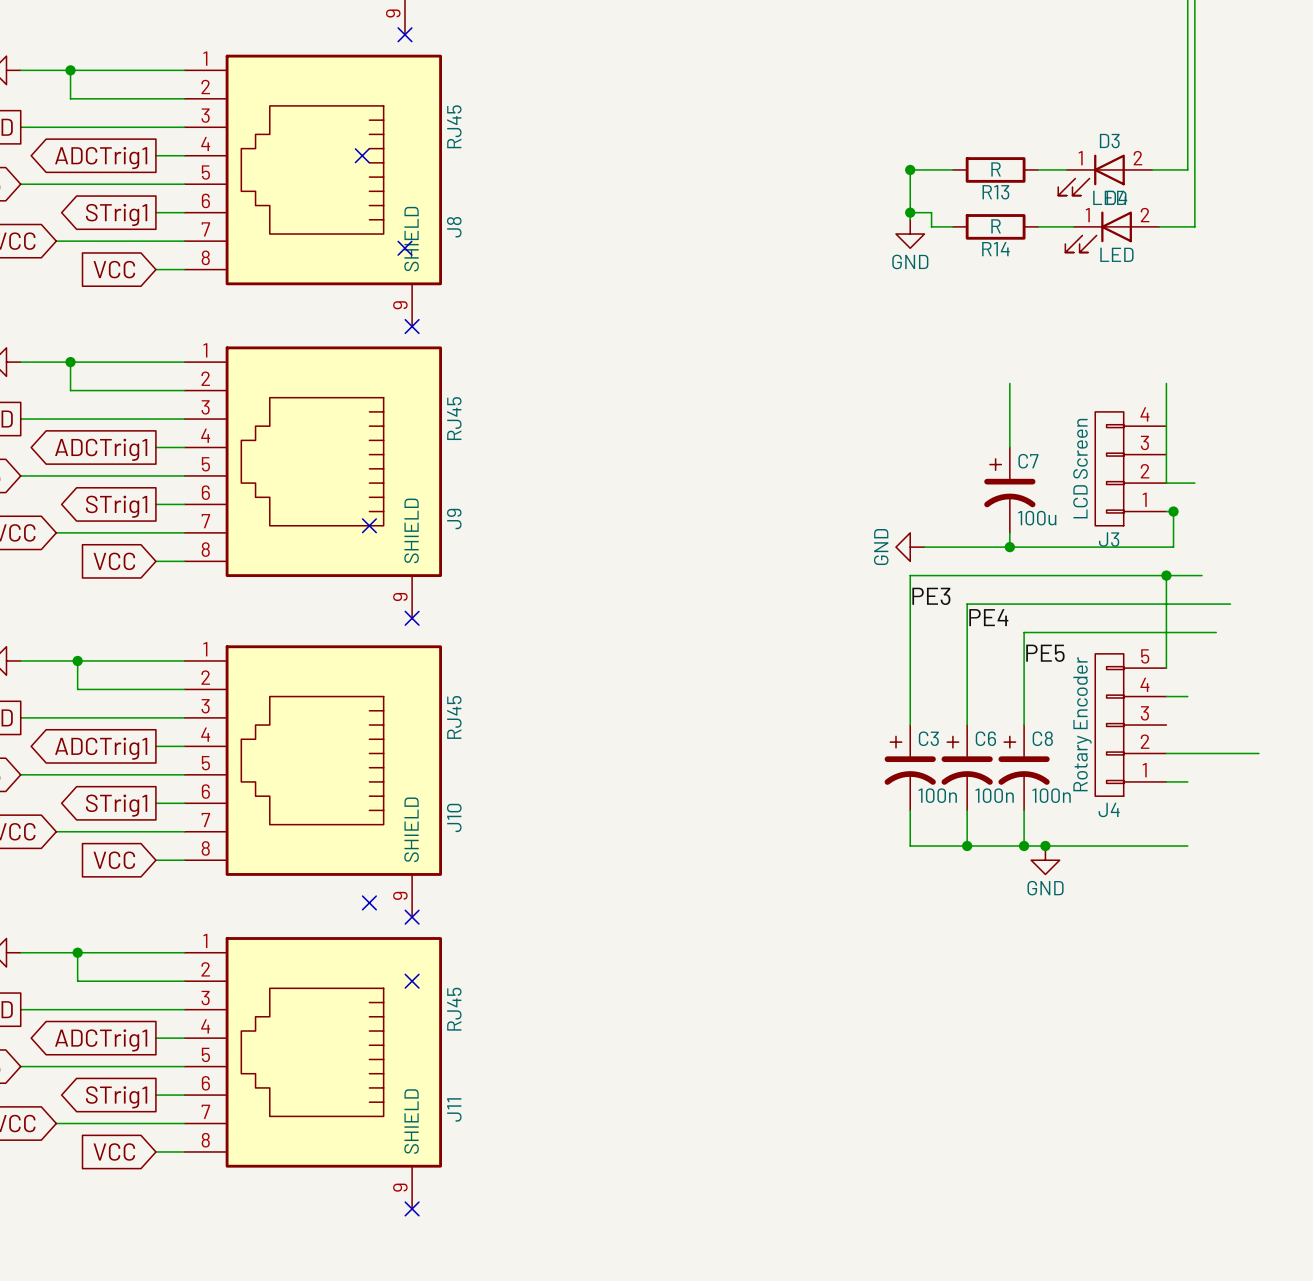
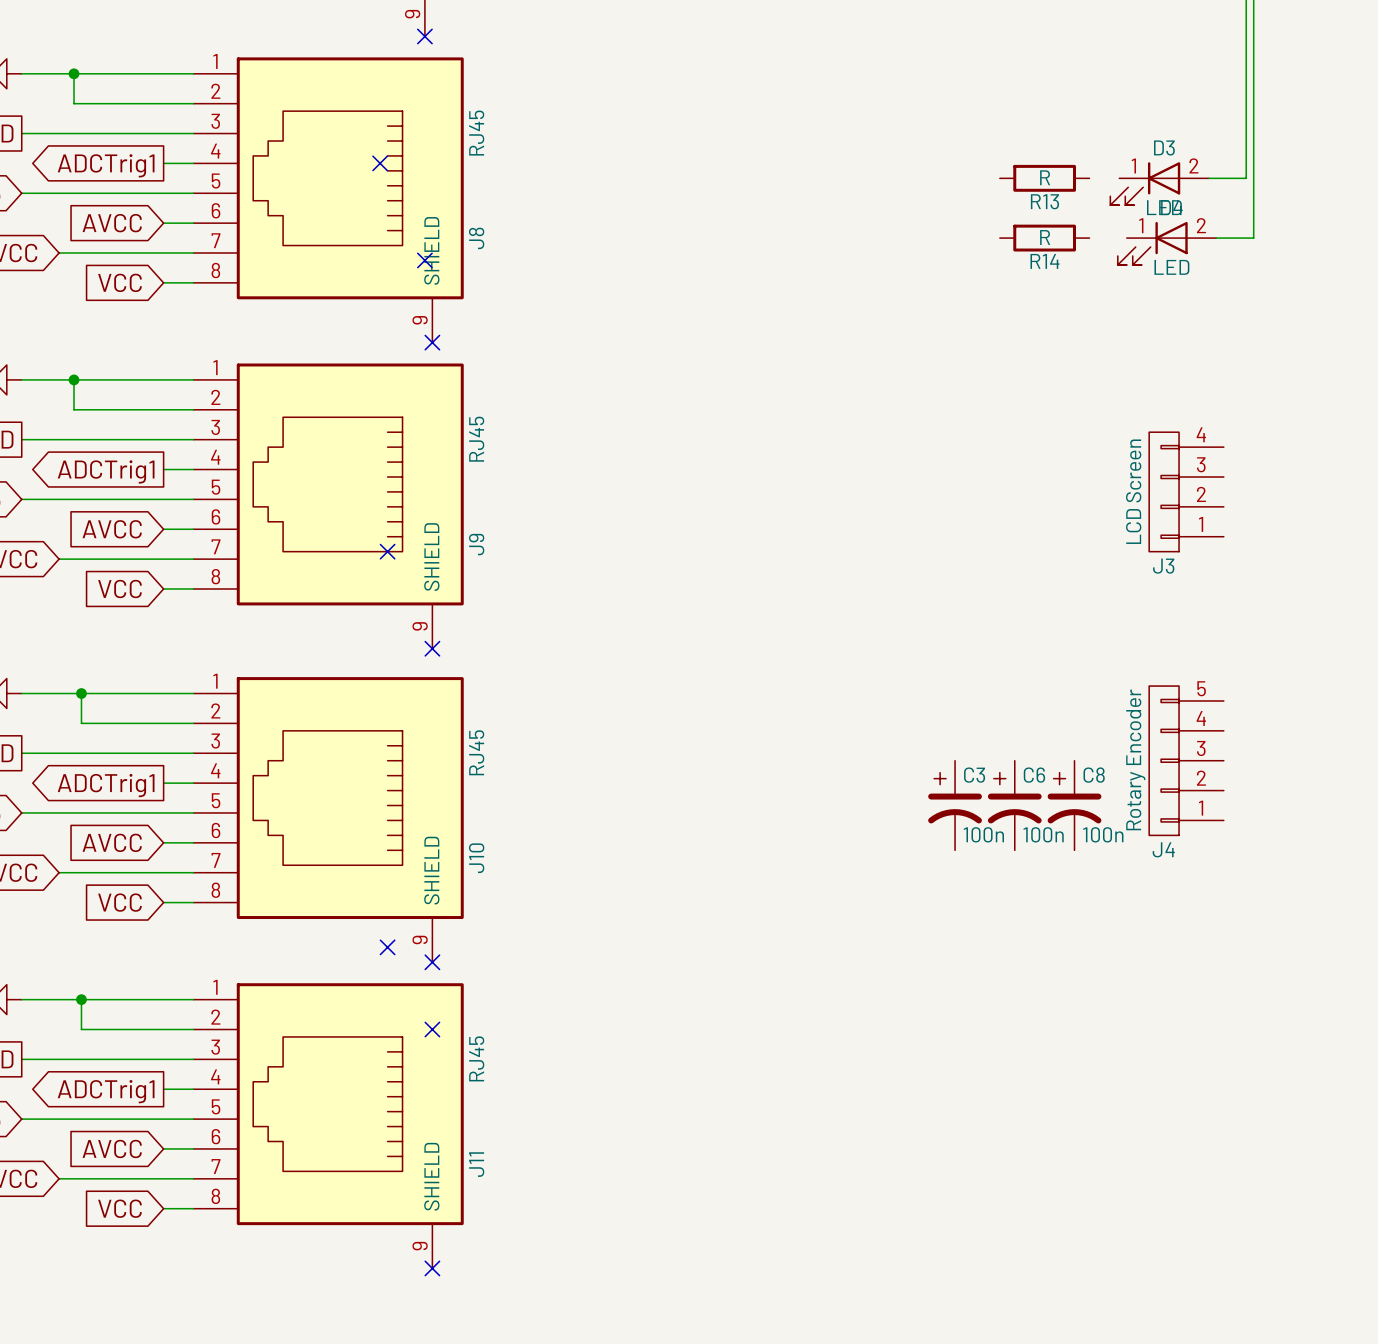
junction: (910, 169) -> none
wire: (952, 169) (910, 169) (910, 219) -> none
wire: (1038, 169) (1066, 169) -> none
wire: (910, 212) (931, 212) (931, 226) (952, 226) -> none
junction: (910, 212) -> none
global label shape: output (116, 214) -> input (112, 223)
global label: STrig1 (116, 214) -> AVCC (112, 223)
wire: (1038, 226) (1073, 226) -> none
power symbol: GND (910, 234) -> none
wire: (1009, 383) (1009, 447) -> none
wire: (1166, 383) (1166, 483) (1194, 483) -> none
C7: 100u (1009, 490) -> none
global label shape: output (116, 506) -> input (112, 529)
global label: STrig1 (116, 506) -> AVCC (112, 529)
wire: (1166, 511) (1173, 511) (1173, 547) (924, 547) -> none
junction: (1173, 511) -> none
wire: (1009, 532) (1009, 547) -> none
power symbol: GND (910, 547) -> none
junction: (1009, 547) -> none
wire: (1166, 575) (1166, 668) -> none
junction: (1166, 575) -> none
wire: (1201, 575) (910, 575) (910, 725) -> none
label: PE3 (931, 596) -> none
wire: (1230, 604) (967, 604) (967, 725) -> none
label: PE4 (988, 617) -> none
wire: (1216, 632) (1024, 632) (1024, 725) -> none
label: PE5 (1045, 653) -> none
wire: (1166, 696) (1187, 696) -> none
wire: (1166, 753) (1258, 753) -> none
wire: (1166, 781) (1187, 781) -> none
global label shape: output (116, 805) -> input (112, 842)
global label: STrig1 (116, 805) -> AVCC (112, 842)
wire: (910, 810) (910, 845) (1187, 845) -> none
wire: (967, 810) (967, 845) -> none
wire: (1024, 810) (1024, 845) -> none
junction: (967, 845) -> none
junction: (1024, 845) -> none
junction: (1045, 845) -> none
power symbol: GND (1045, 860) -> none
global label shape: output (116, 1097) -> input (112, 1148)
global label: STrig1 (116, 1097) -> AVCC (112, 1148)

